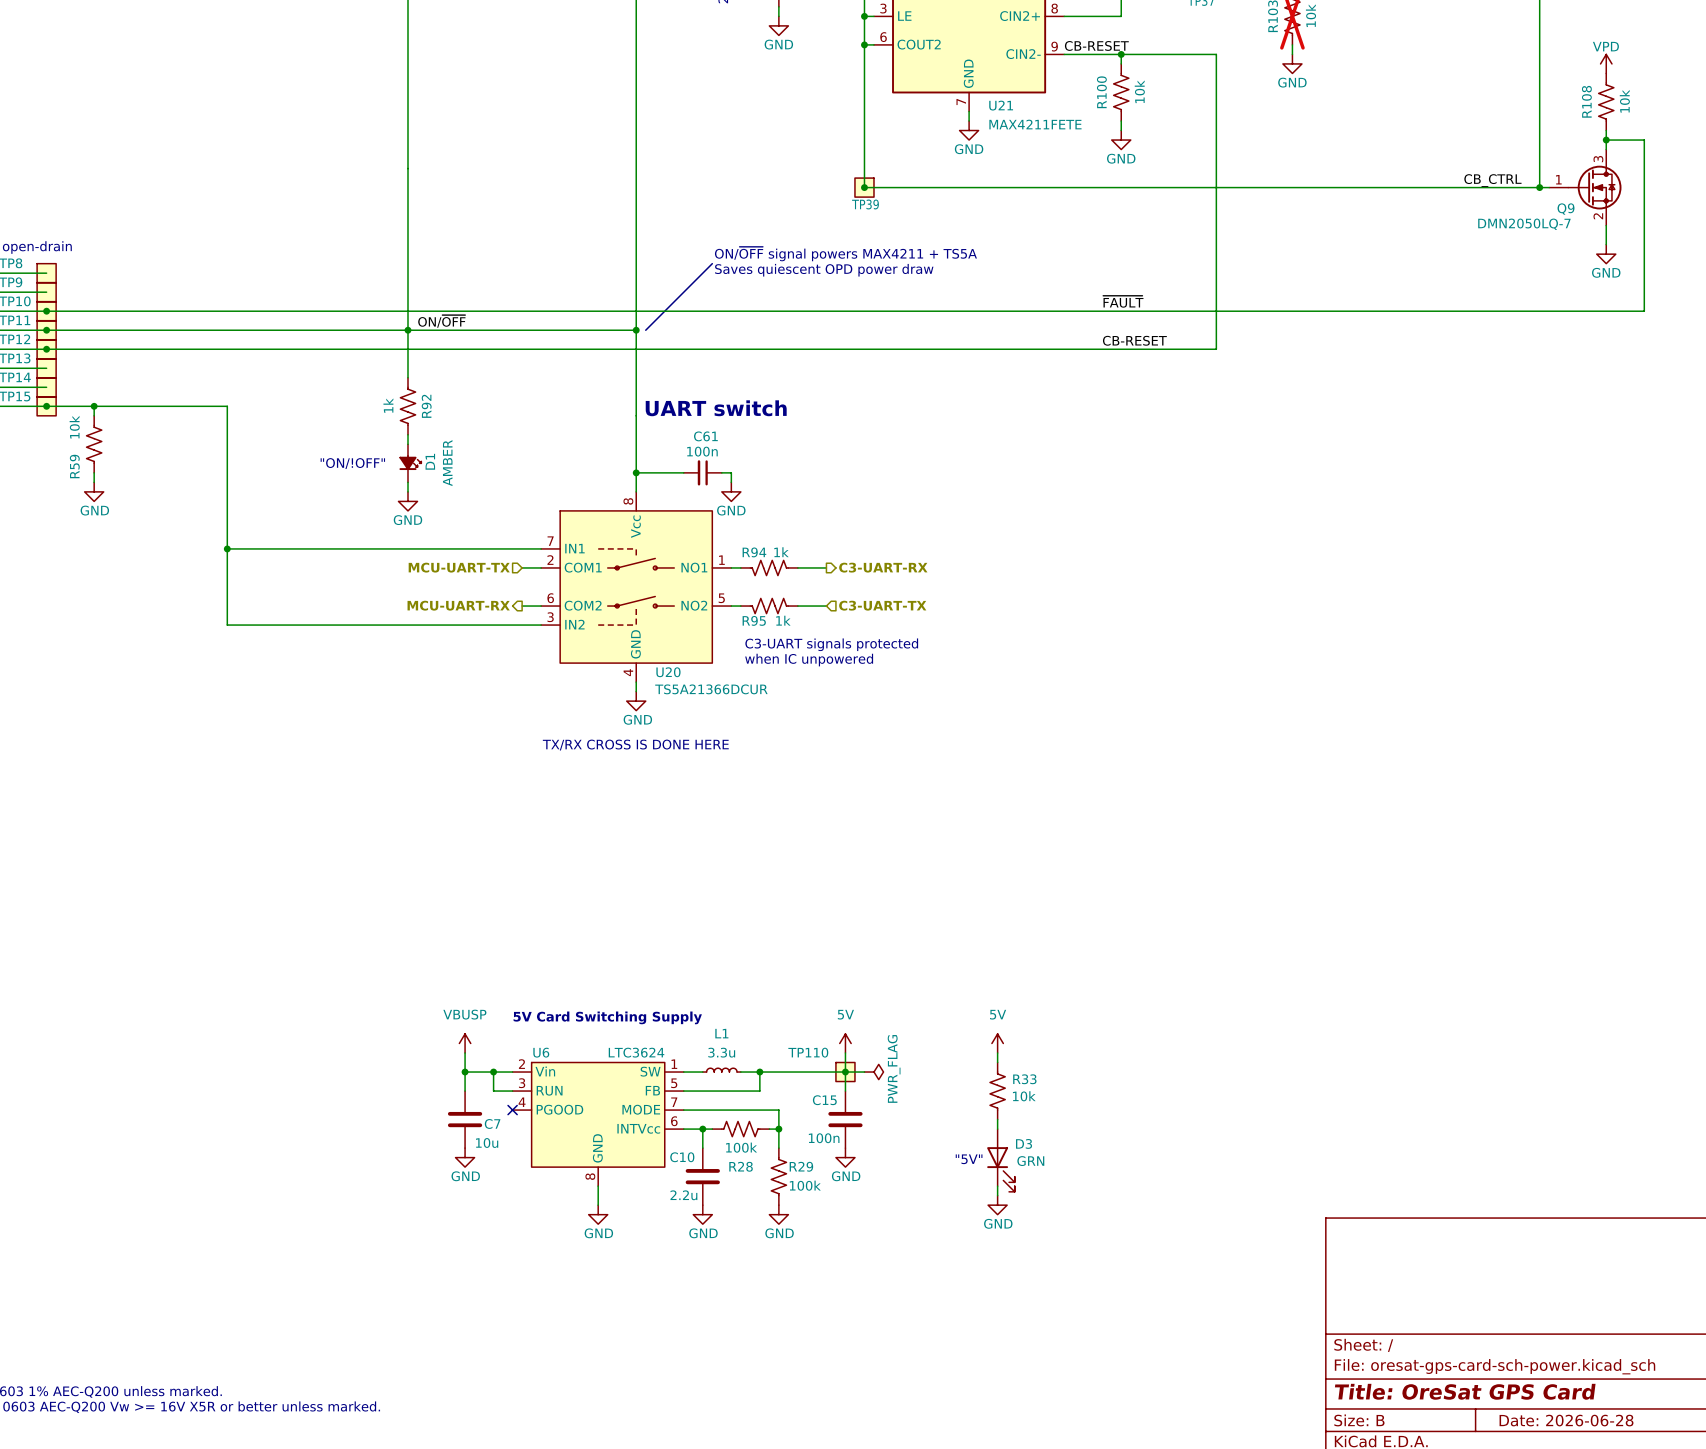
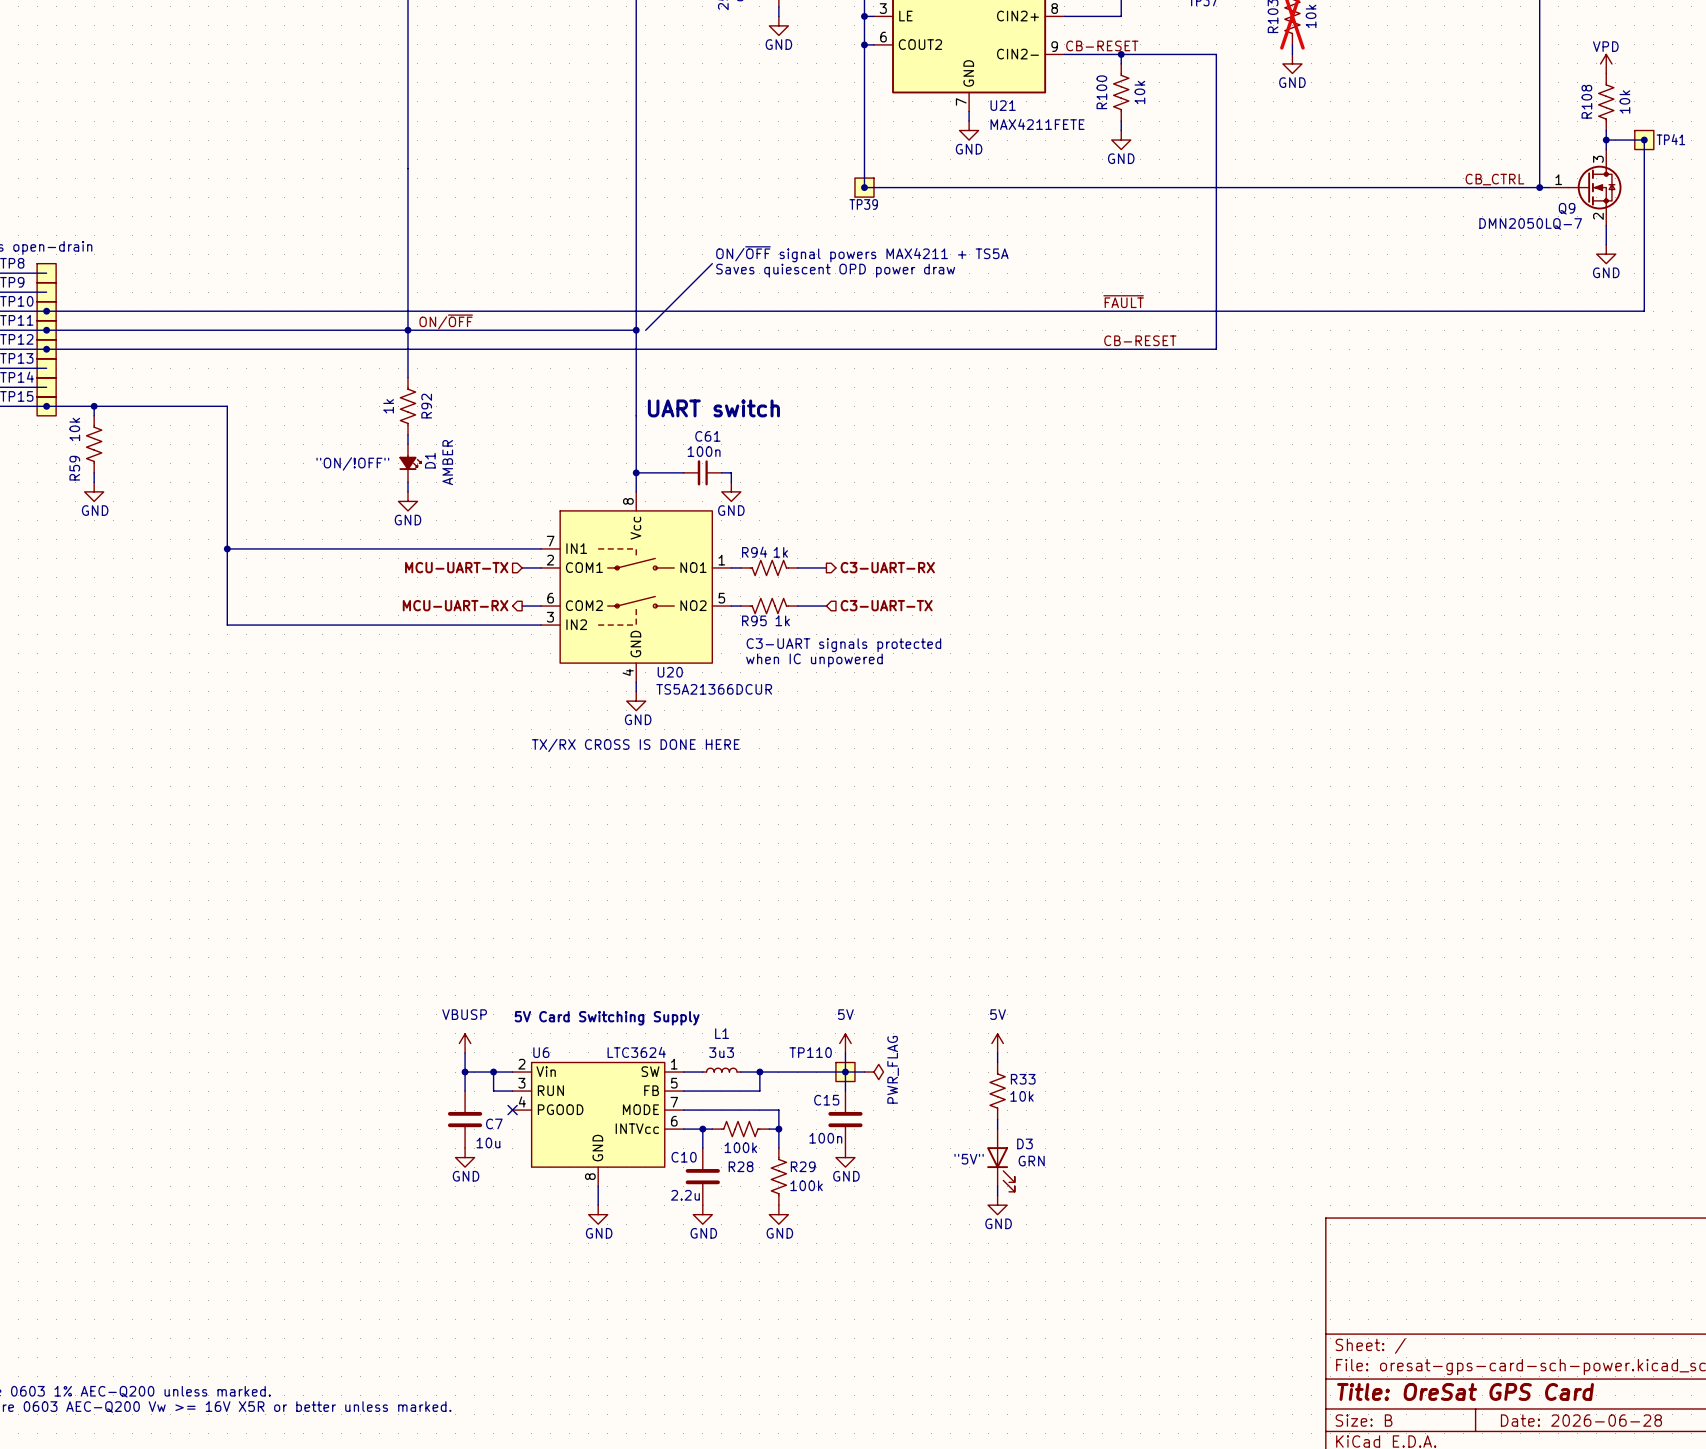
TP41: none -> (1644, 140)
junction: none -> (1644, 140)
L1 value: 3.3u (721, 1052) -> 3u3 (721, 1052)

